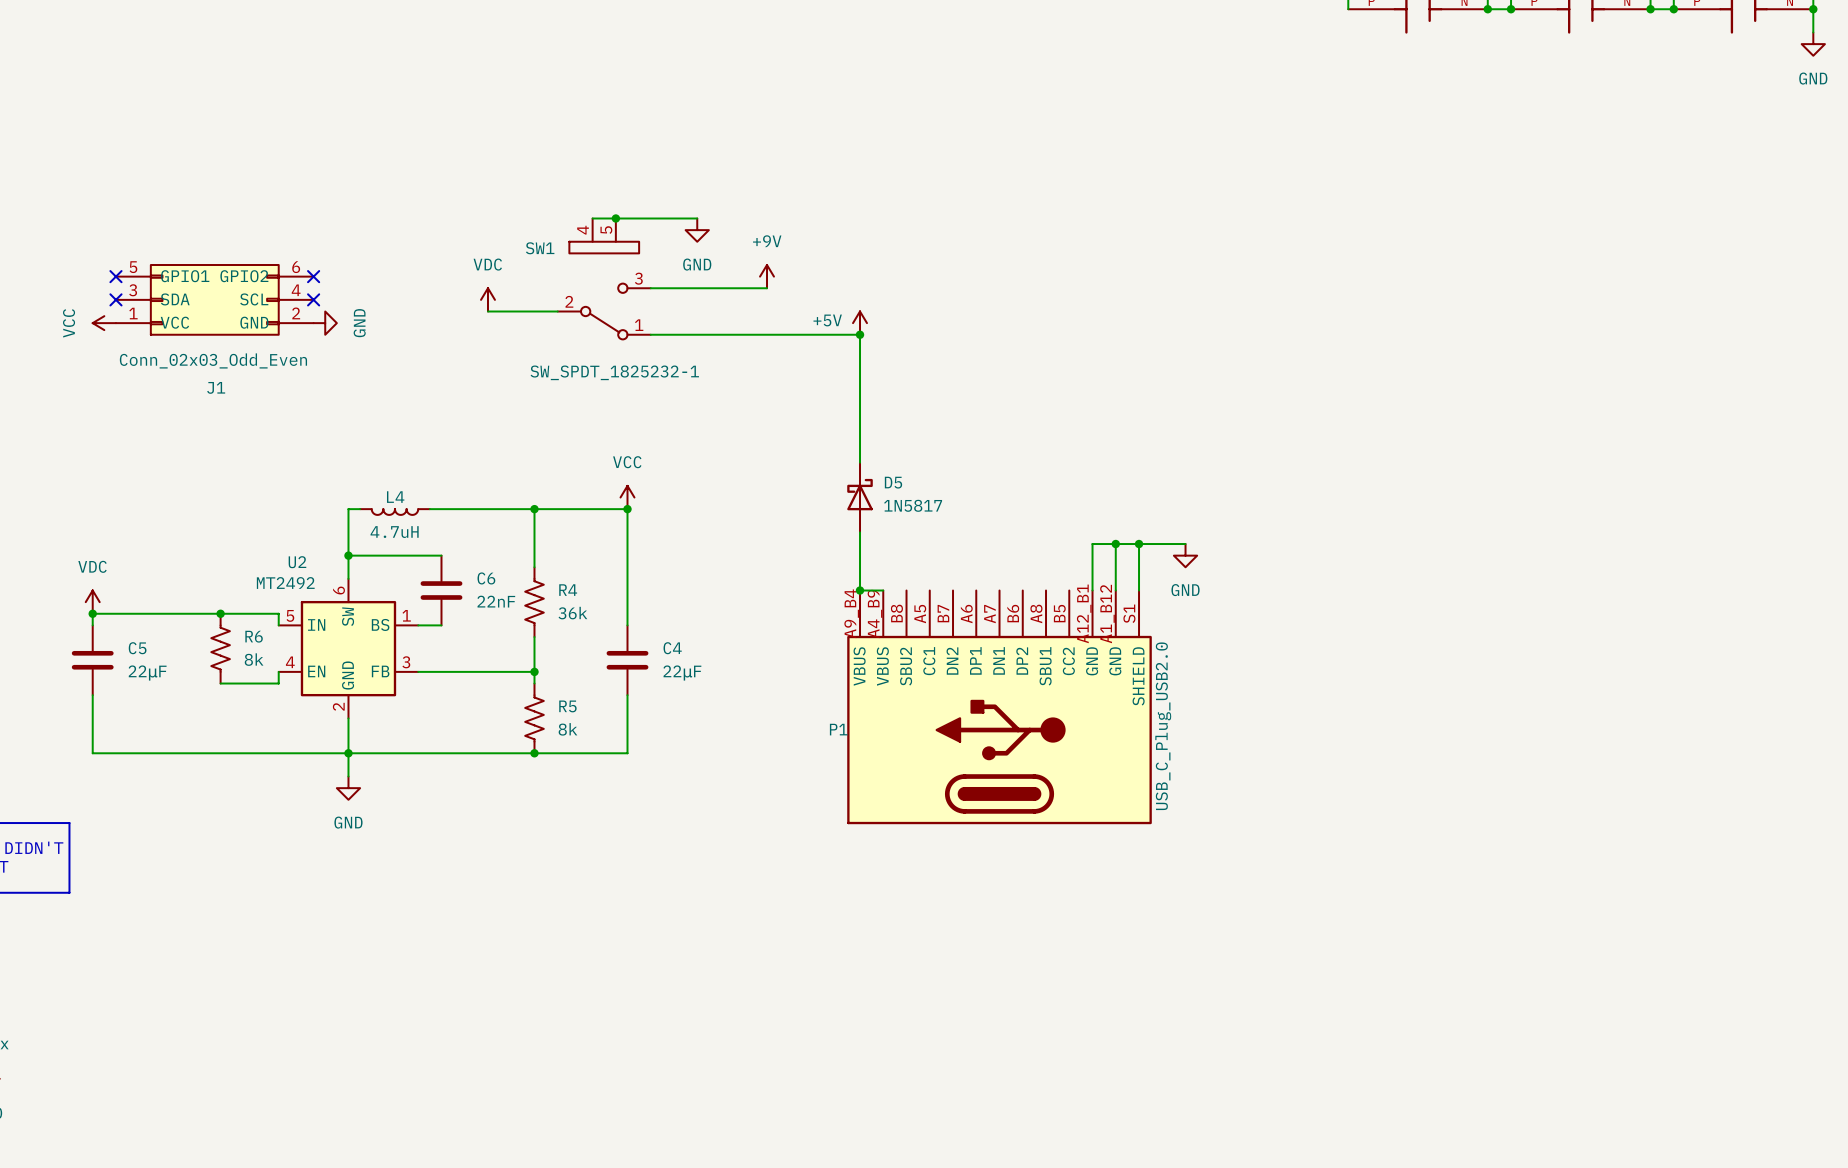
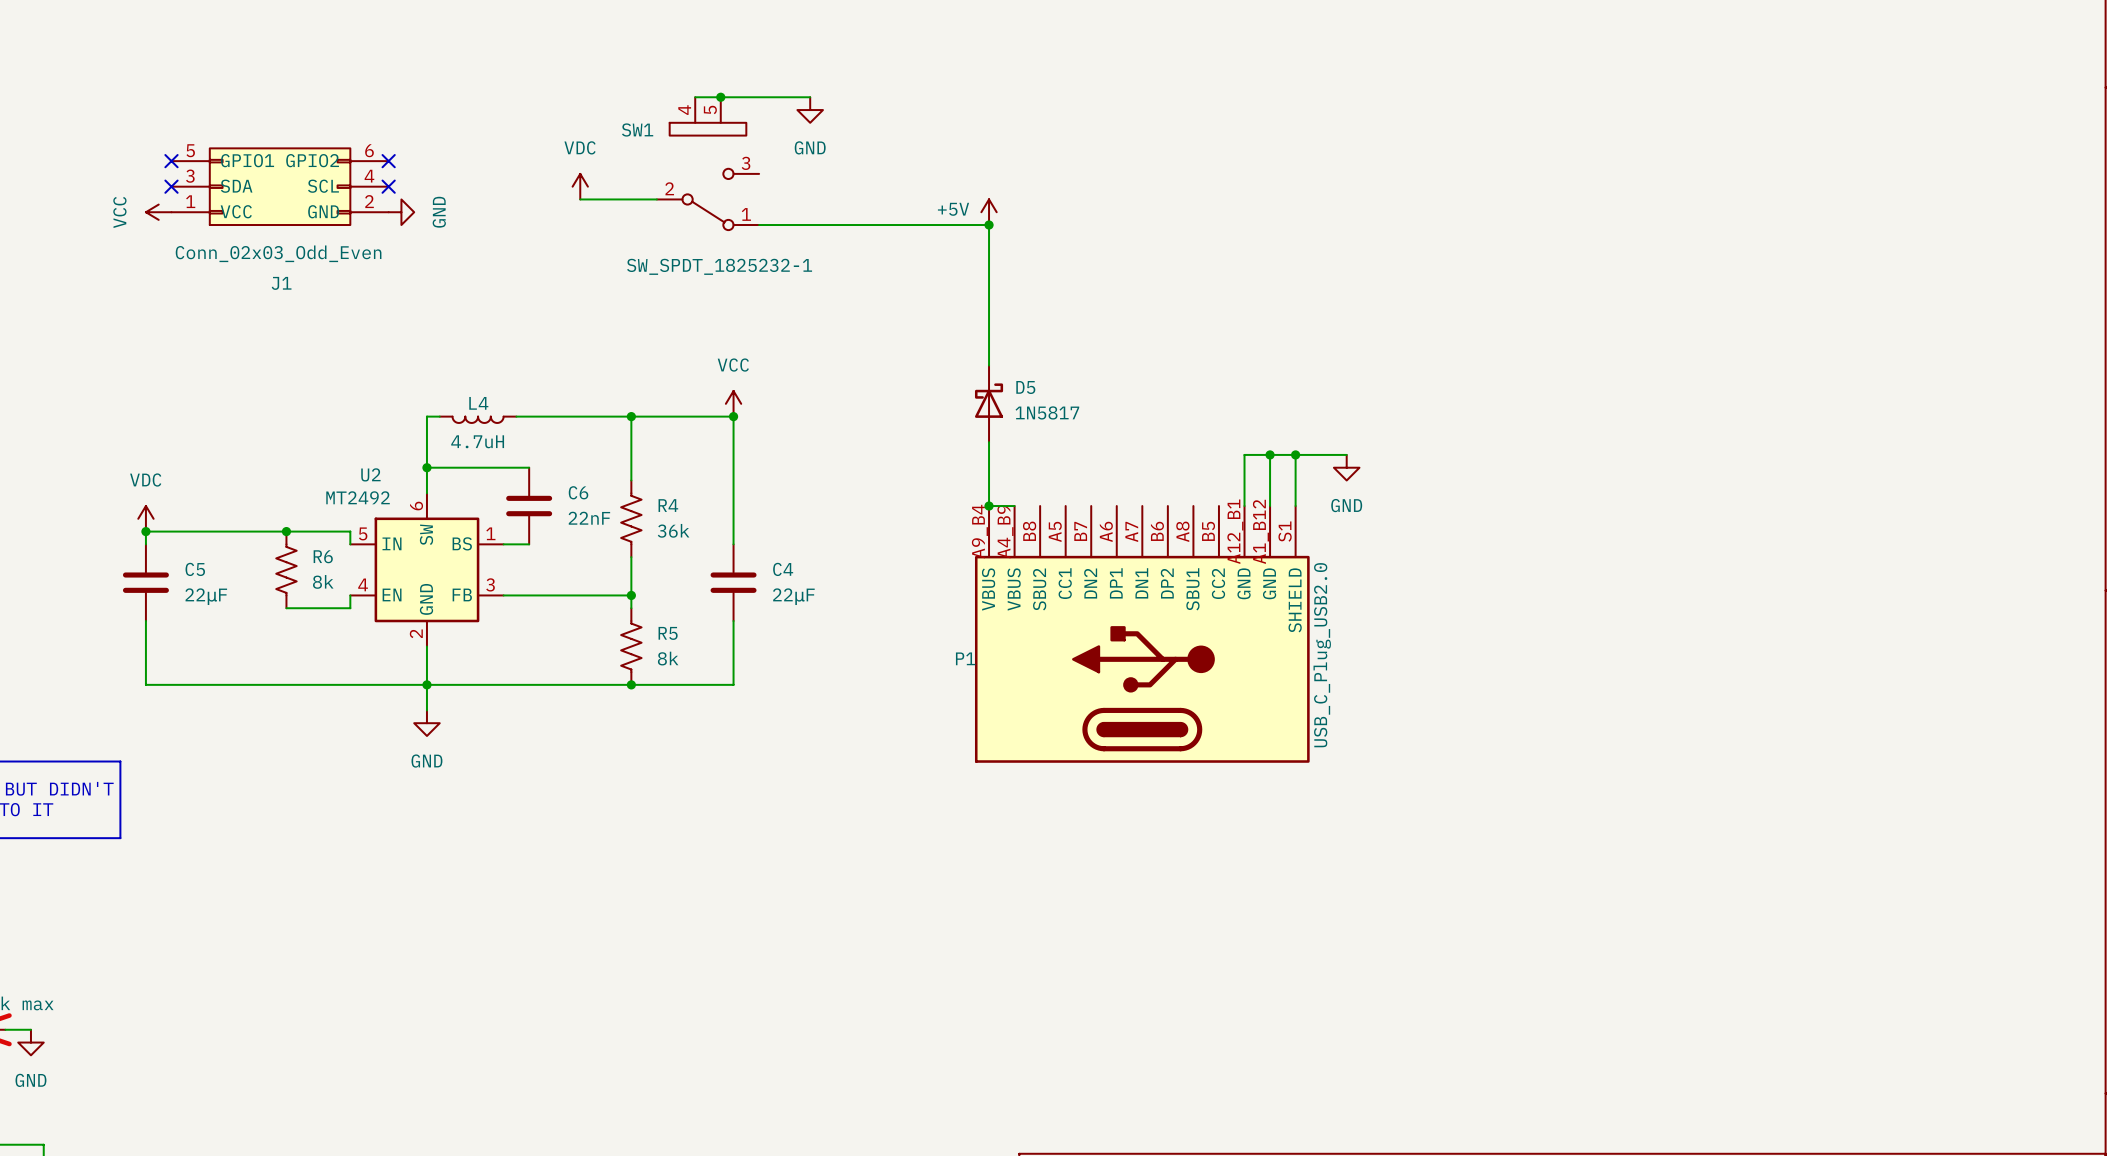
power symbol: +9V (767, 276) -> none
wire: (650, 288) (767, 288) -> none

